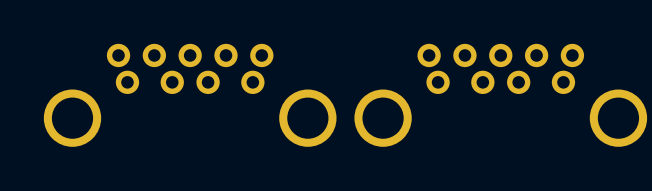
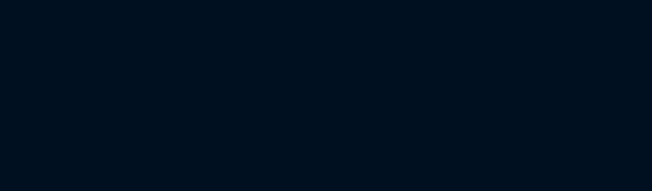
part: (190, 95) -> none
part: (500, 95) -> none

